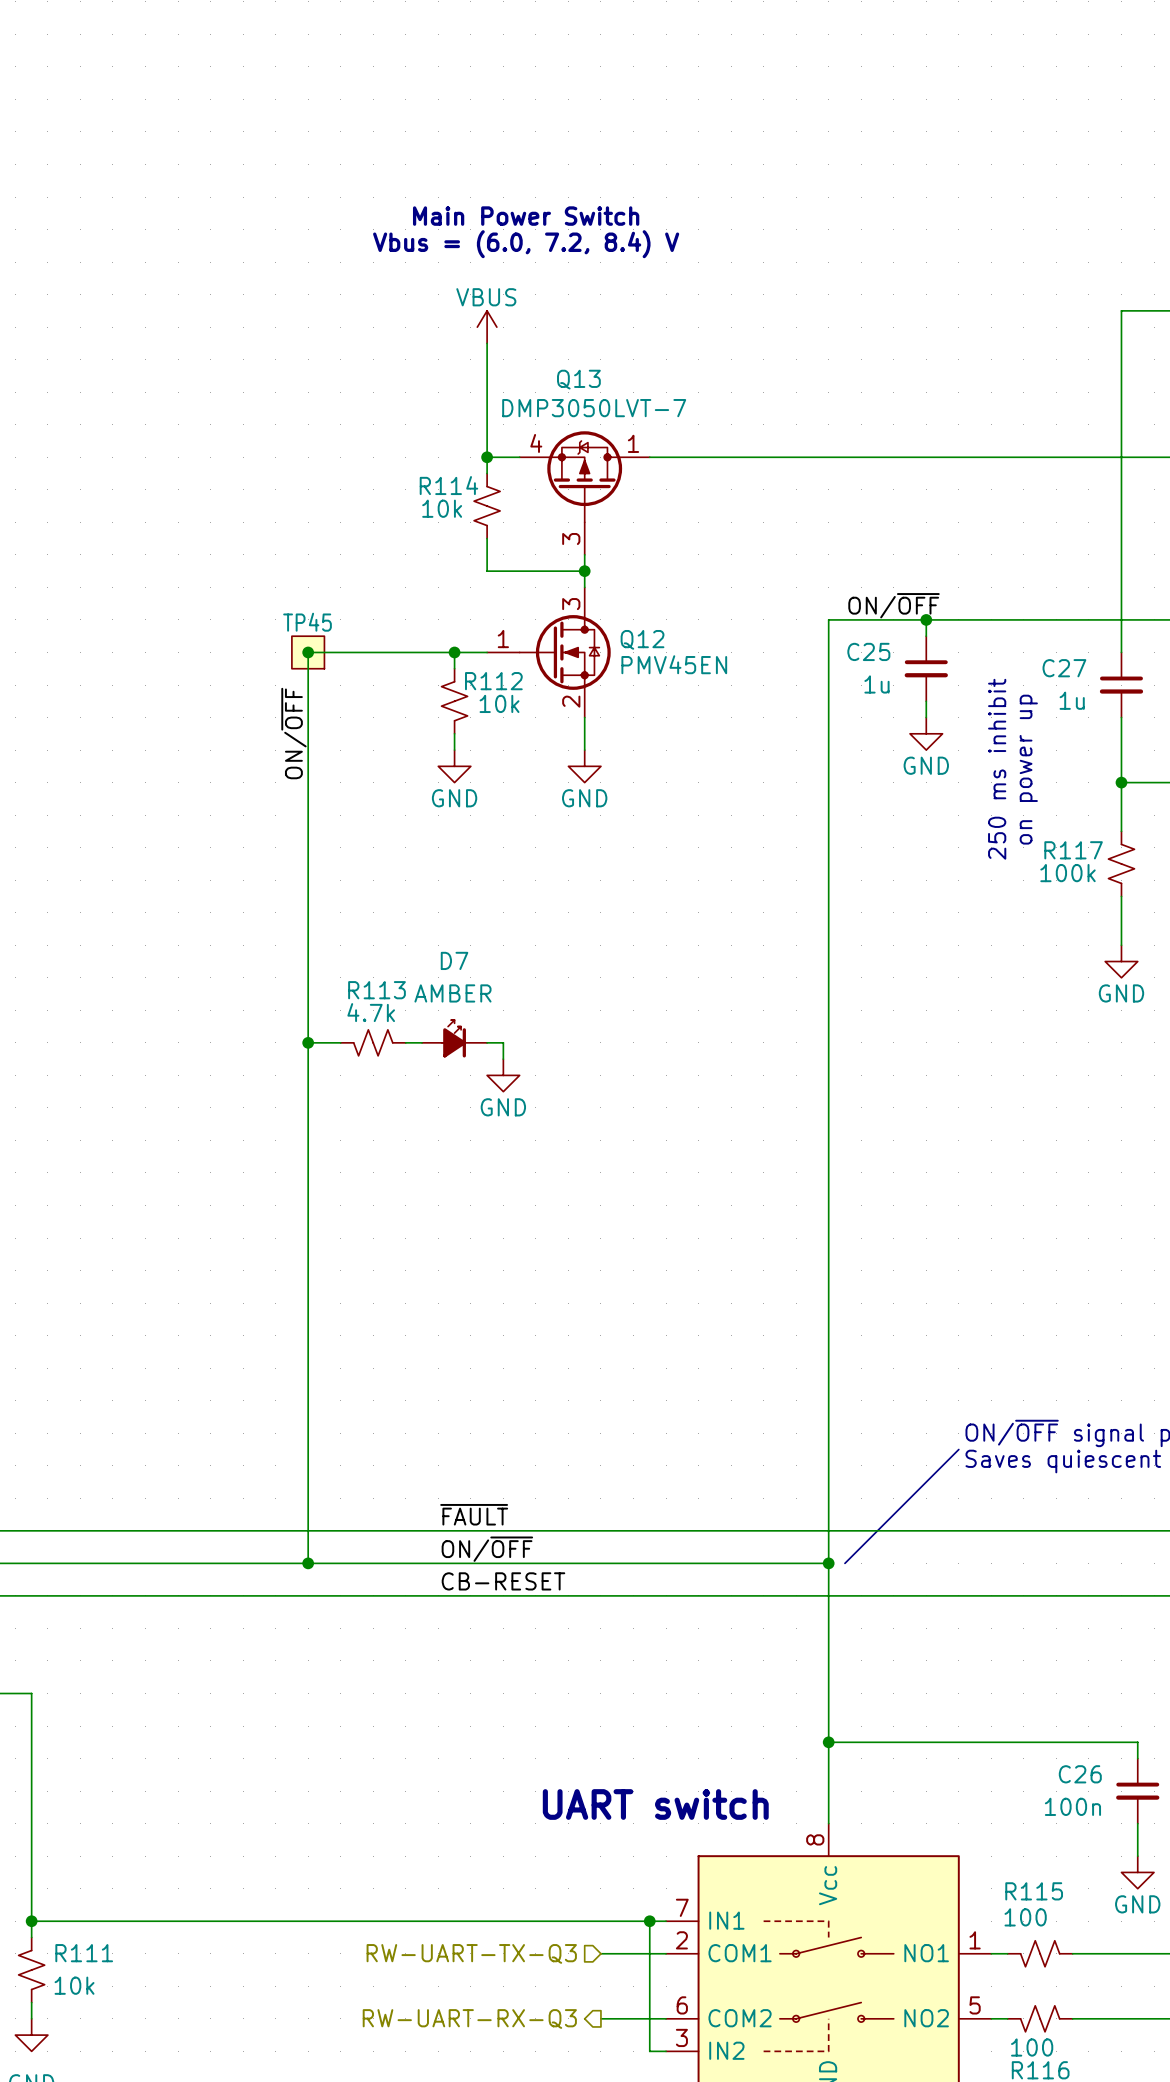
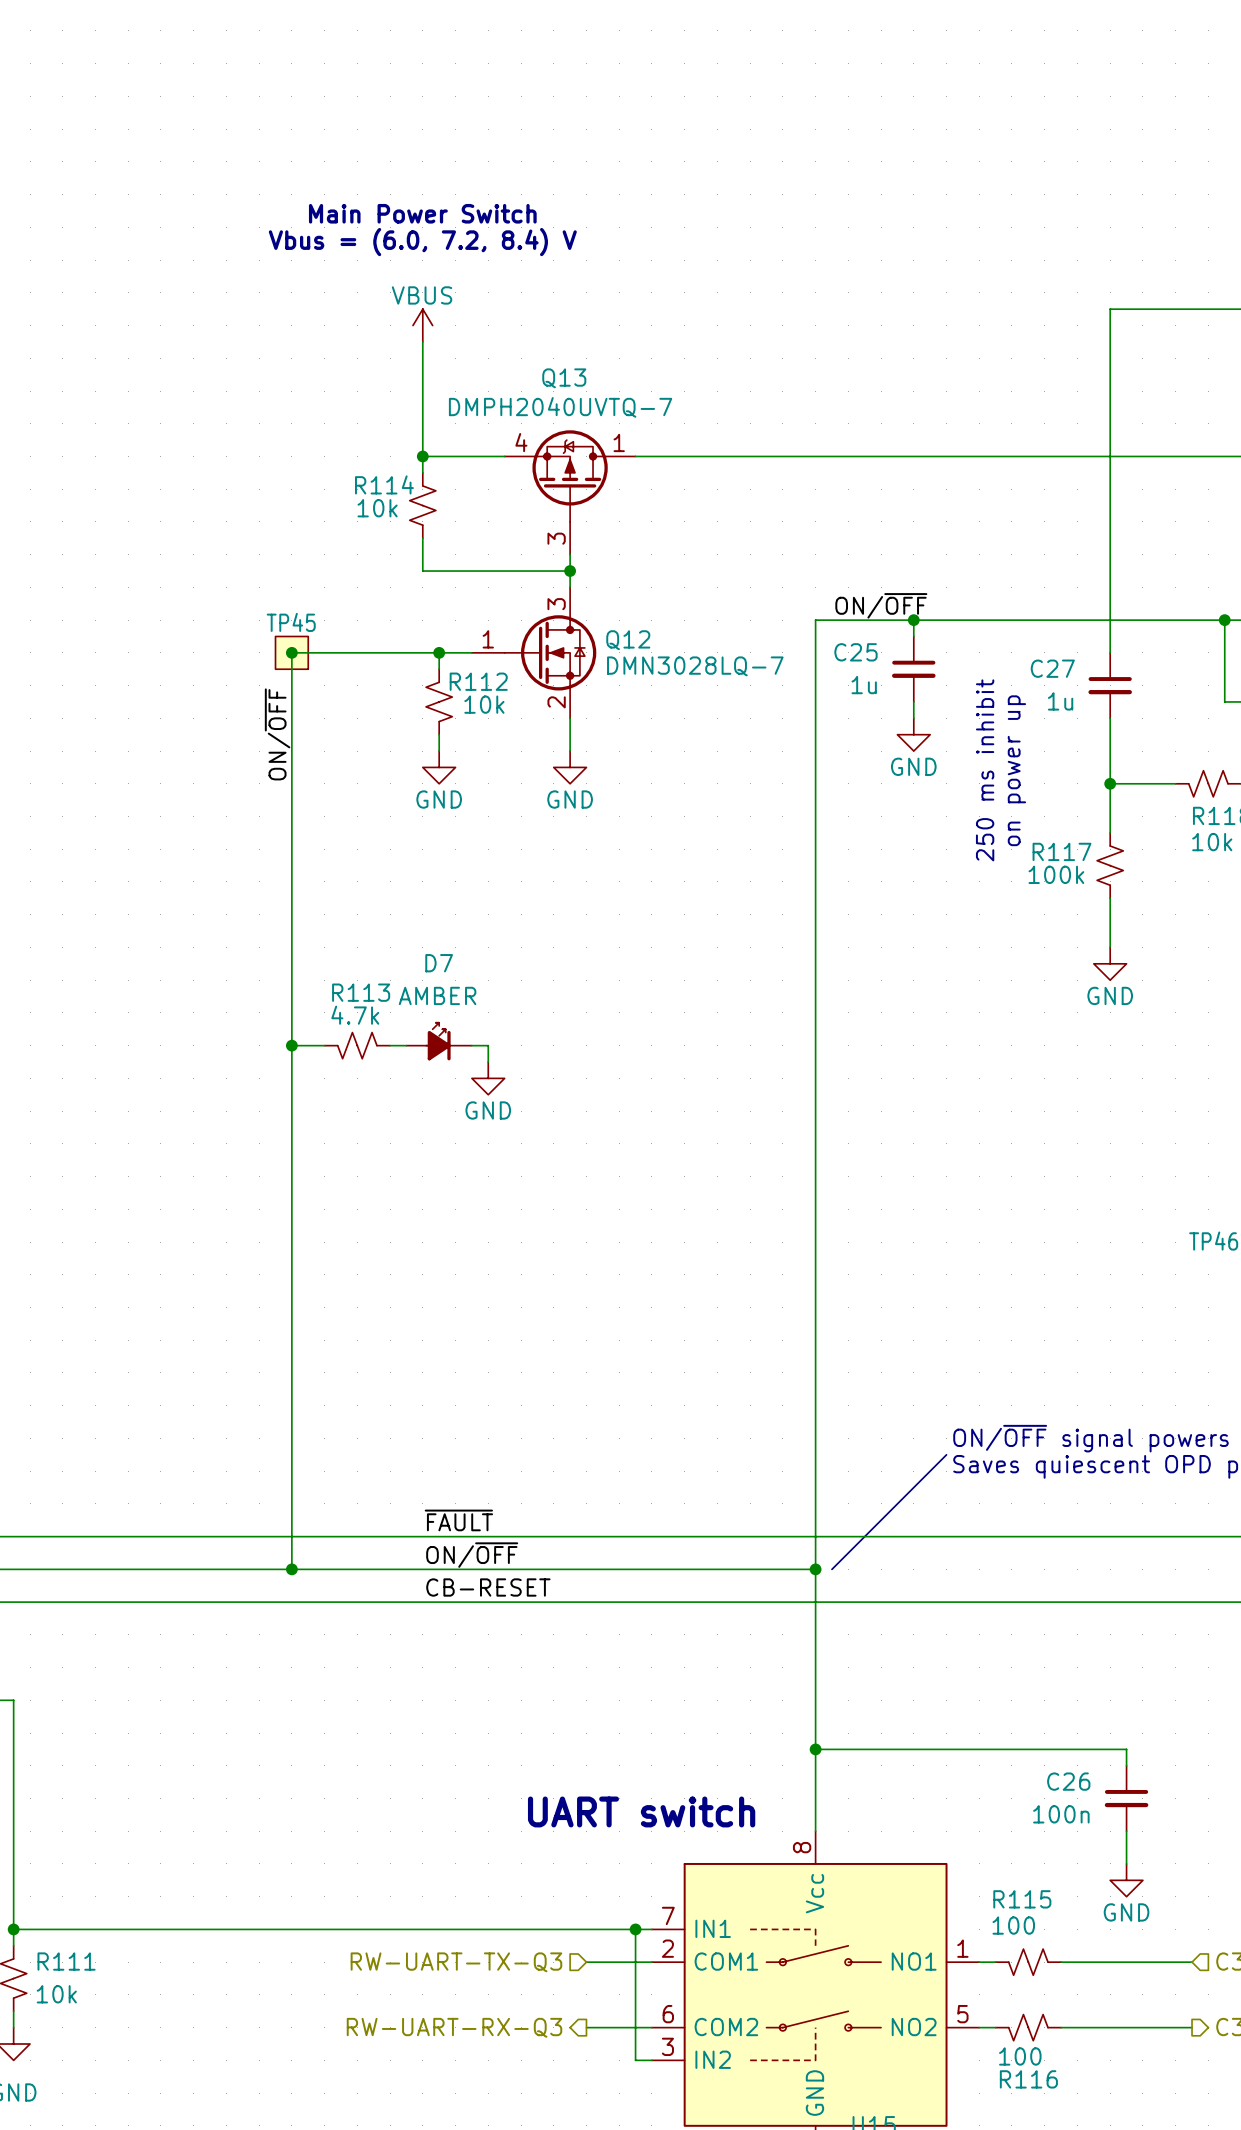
text position: Main Power Switch (526, 216) -> Main Power Switch (422, 213)
text position: Vbus = (6.0, 7.2, 8.4) V (526, 244) -> Vbus = (6.0, 7.2, 8.4) V (422, 242)
power symbol position: VBUS (487, 327) -> VBUS (422, 325)
wire: (487, 343) (487, 473) -> (422, 341) (422, 472)
Q13 value: DMP3050LVT-7 (594, 408) -> DMPH2040UVTQ-7 (560, 407)
wire: none -> (422, 456) (471, 456)
junction position: (487, 457) -> (422, 456)
R114 position: (487, 506) -> (422, 505)
wire: (487, 538) (487, 571) -> (422, 538) (422, 571) (471, 571)
Q12 value: PMV45EN (674, 664) -> DMN3028LQ-7 (695, 666)

